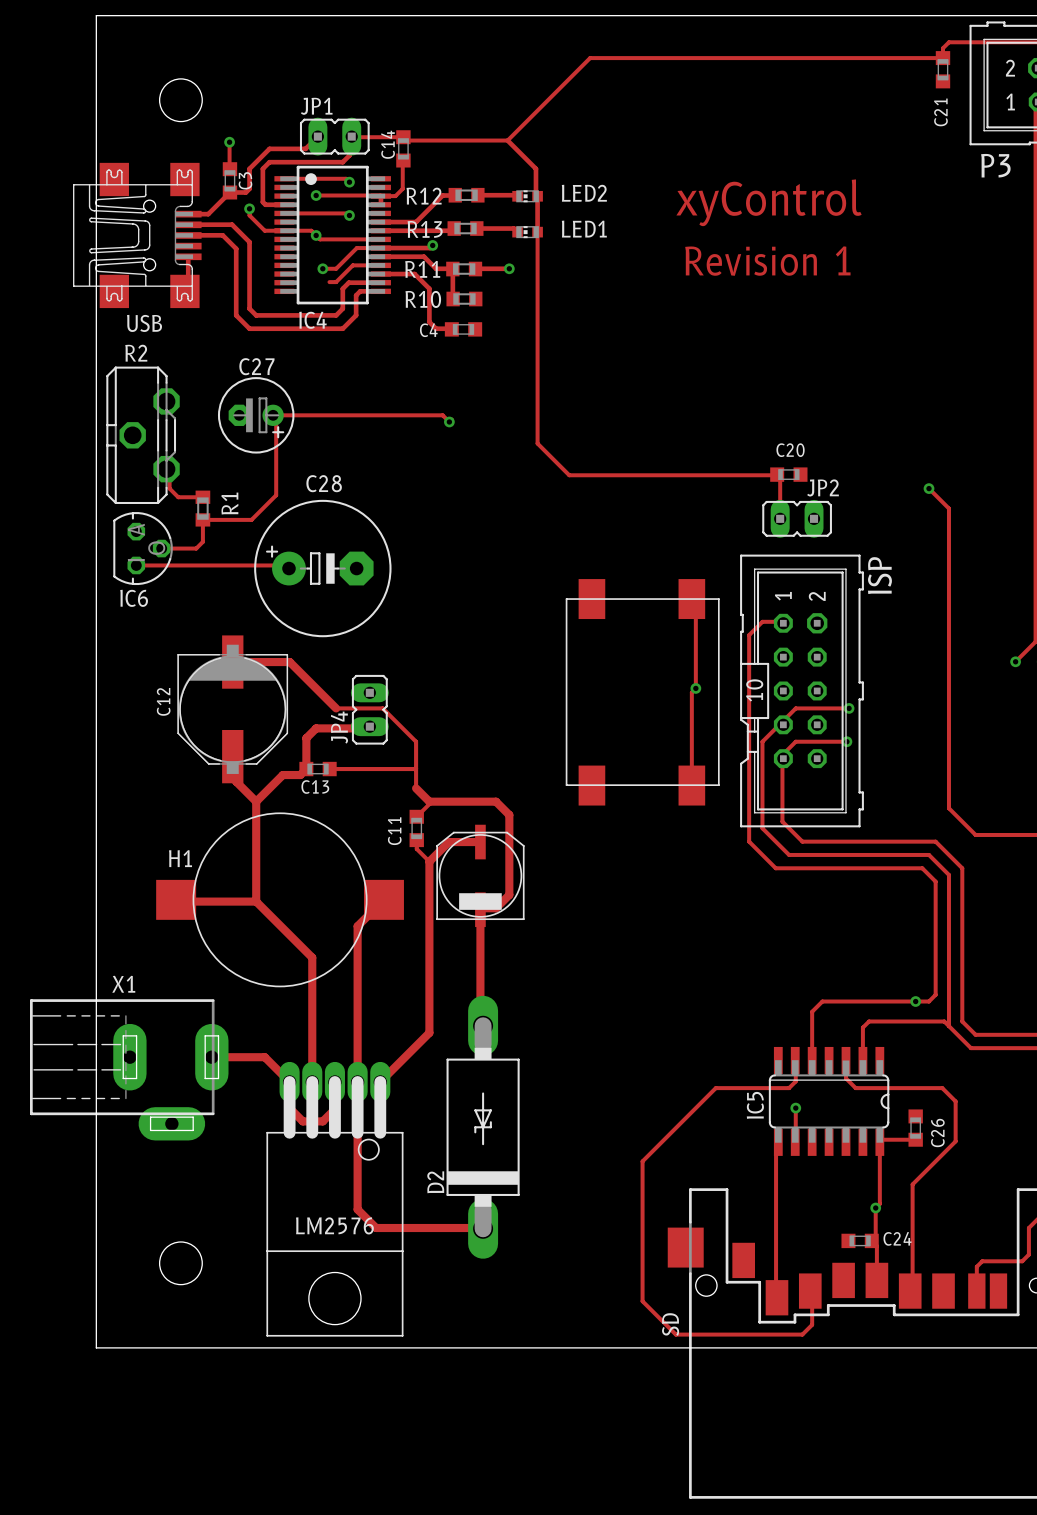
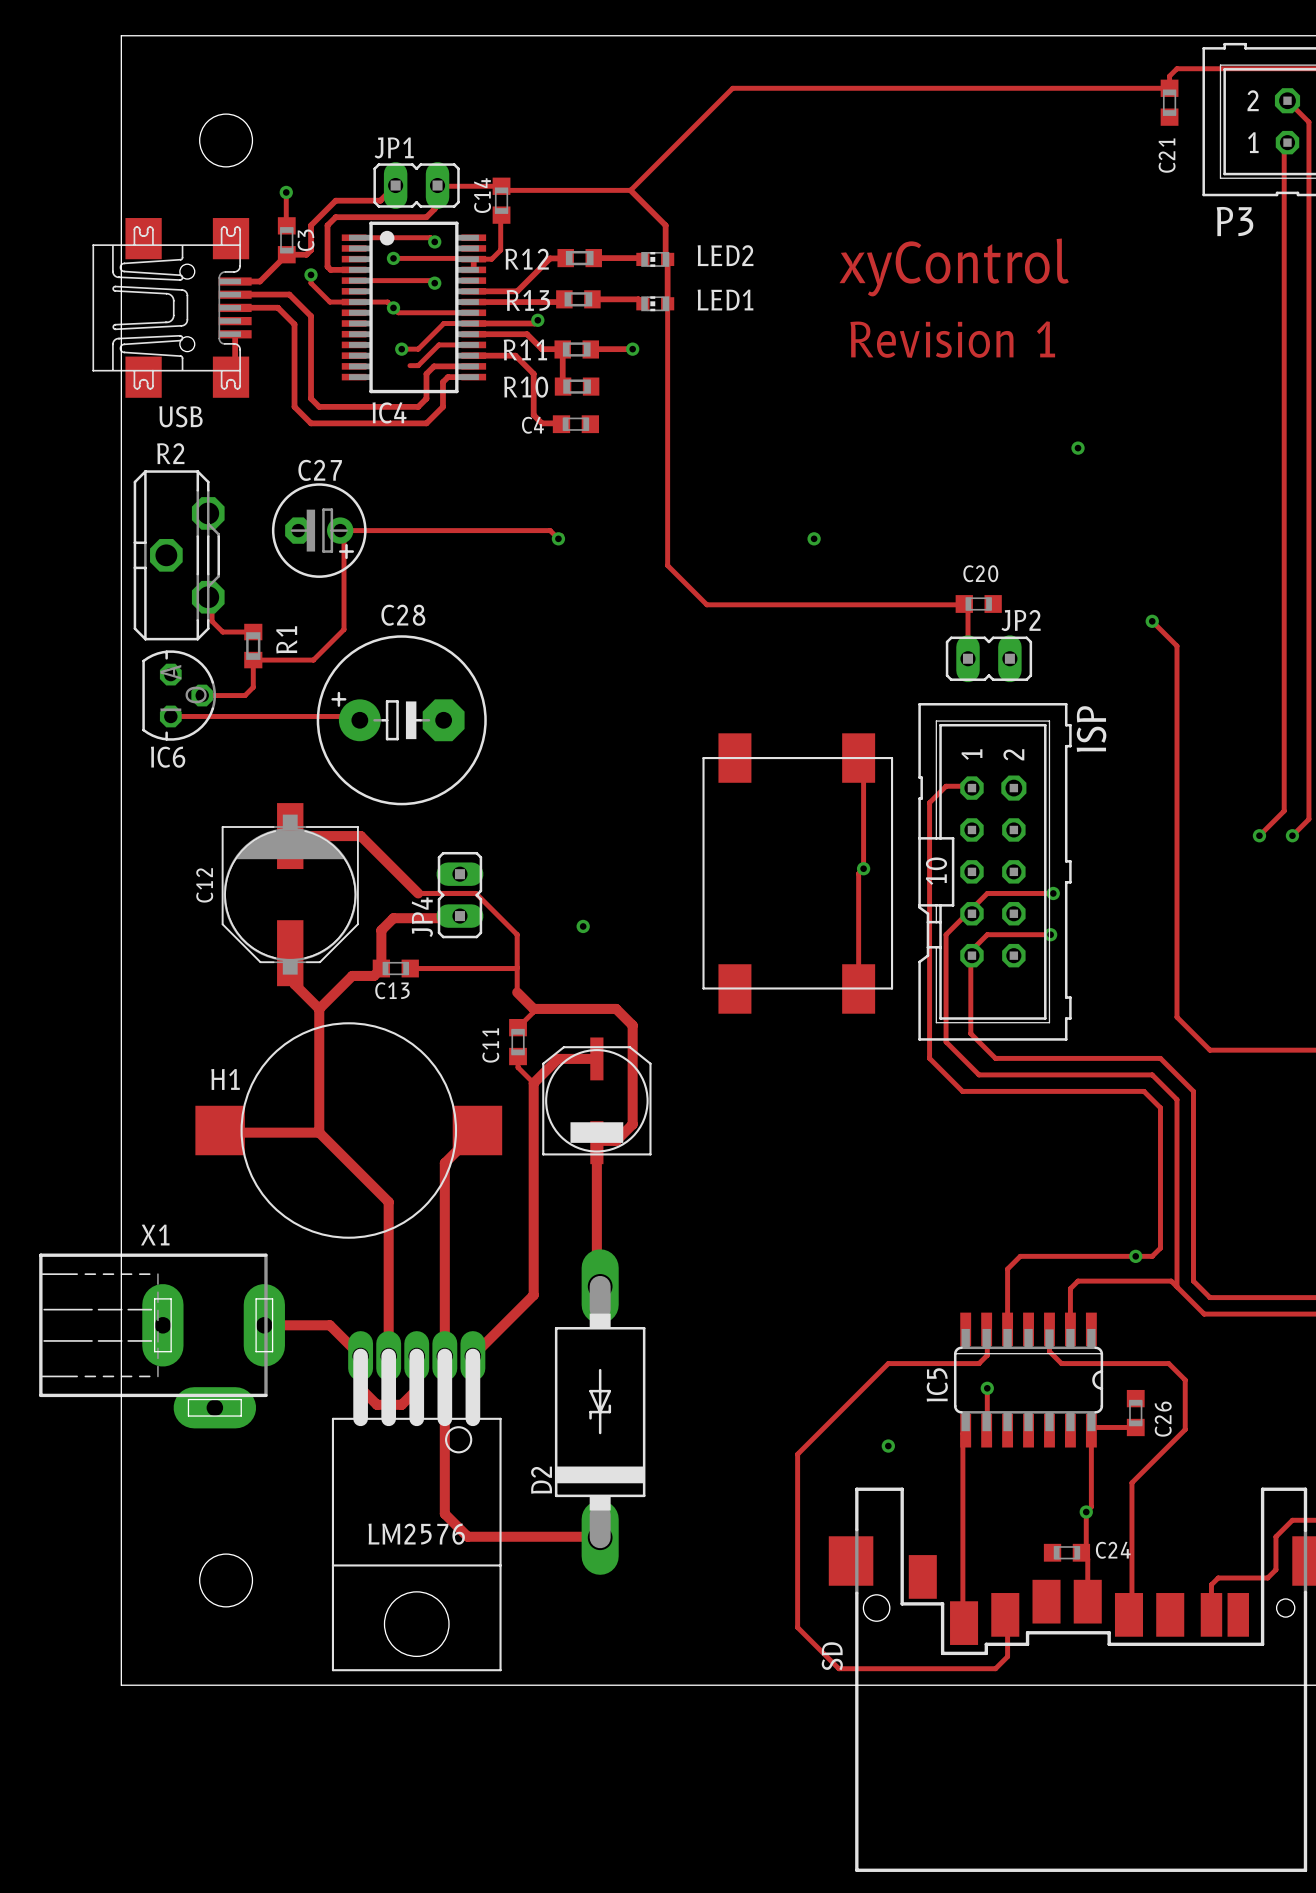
via: none -> (1078, 448)
via: none -> (814, 538)
via: none -> (583, 926)
via: none -> (888, 1446)

